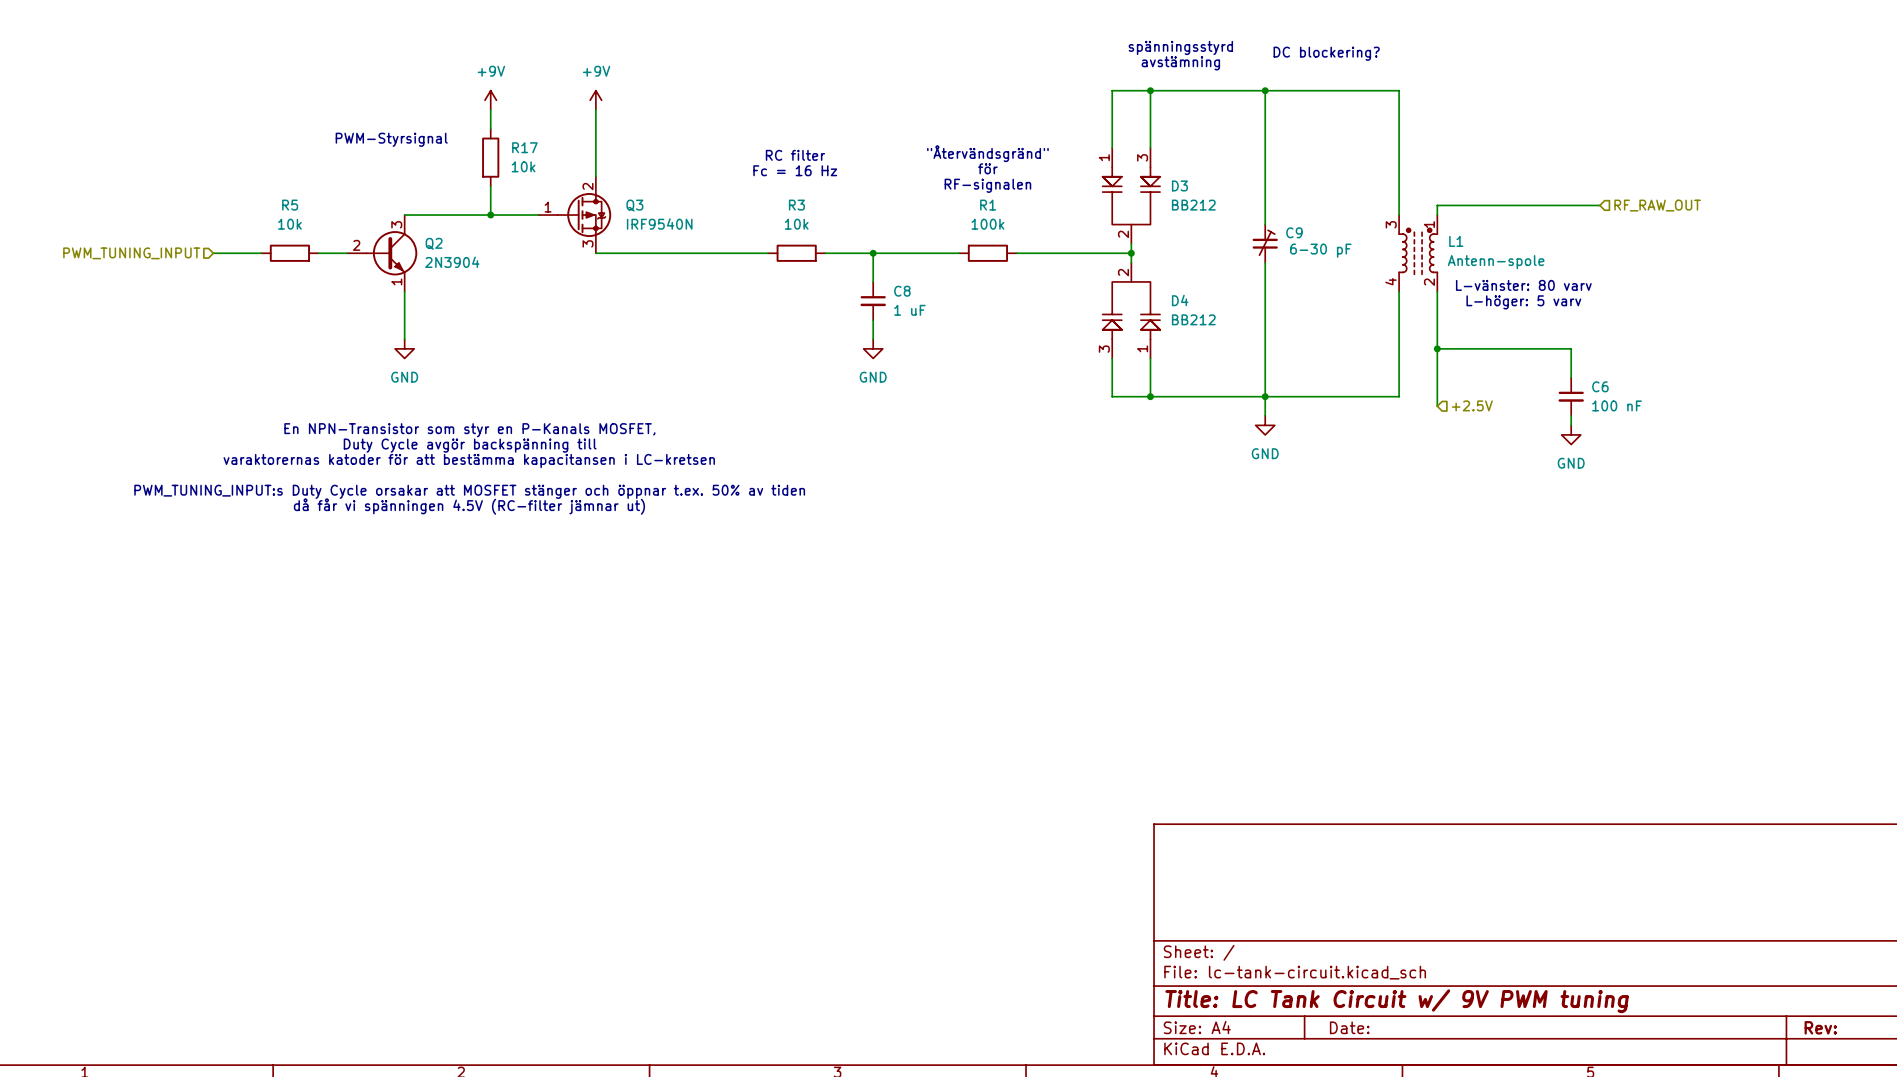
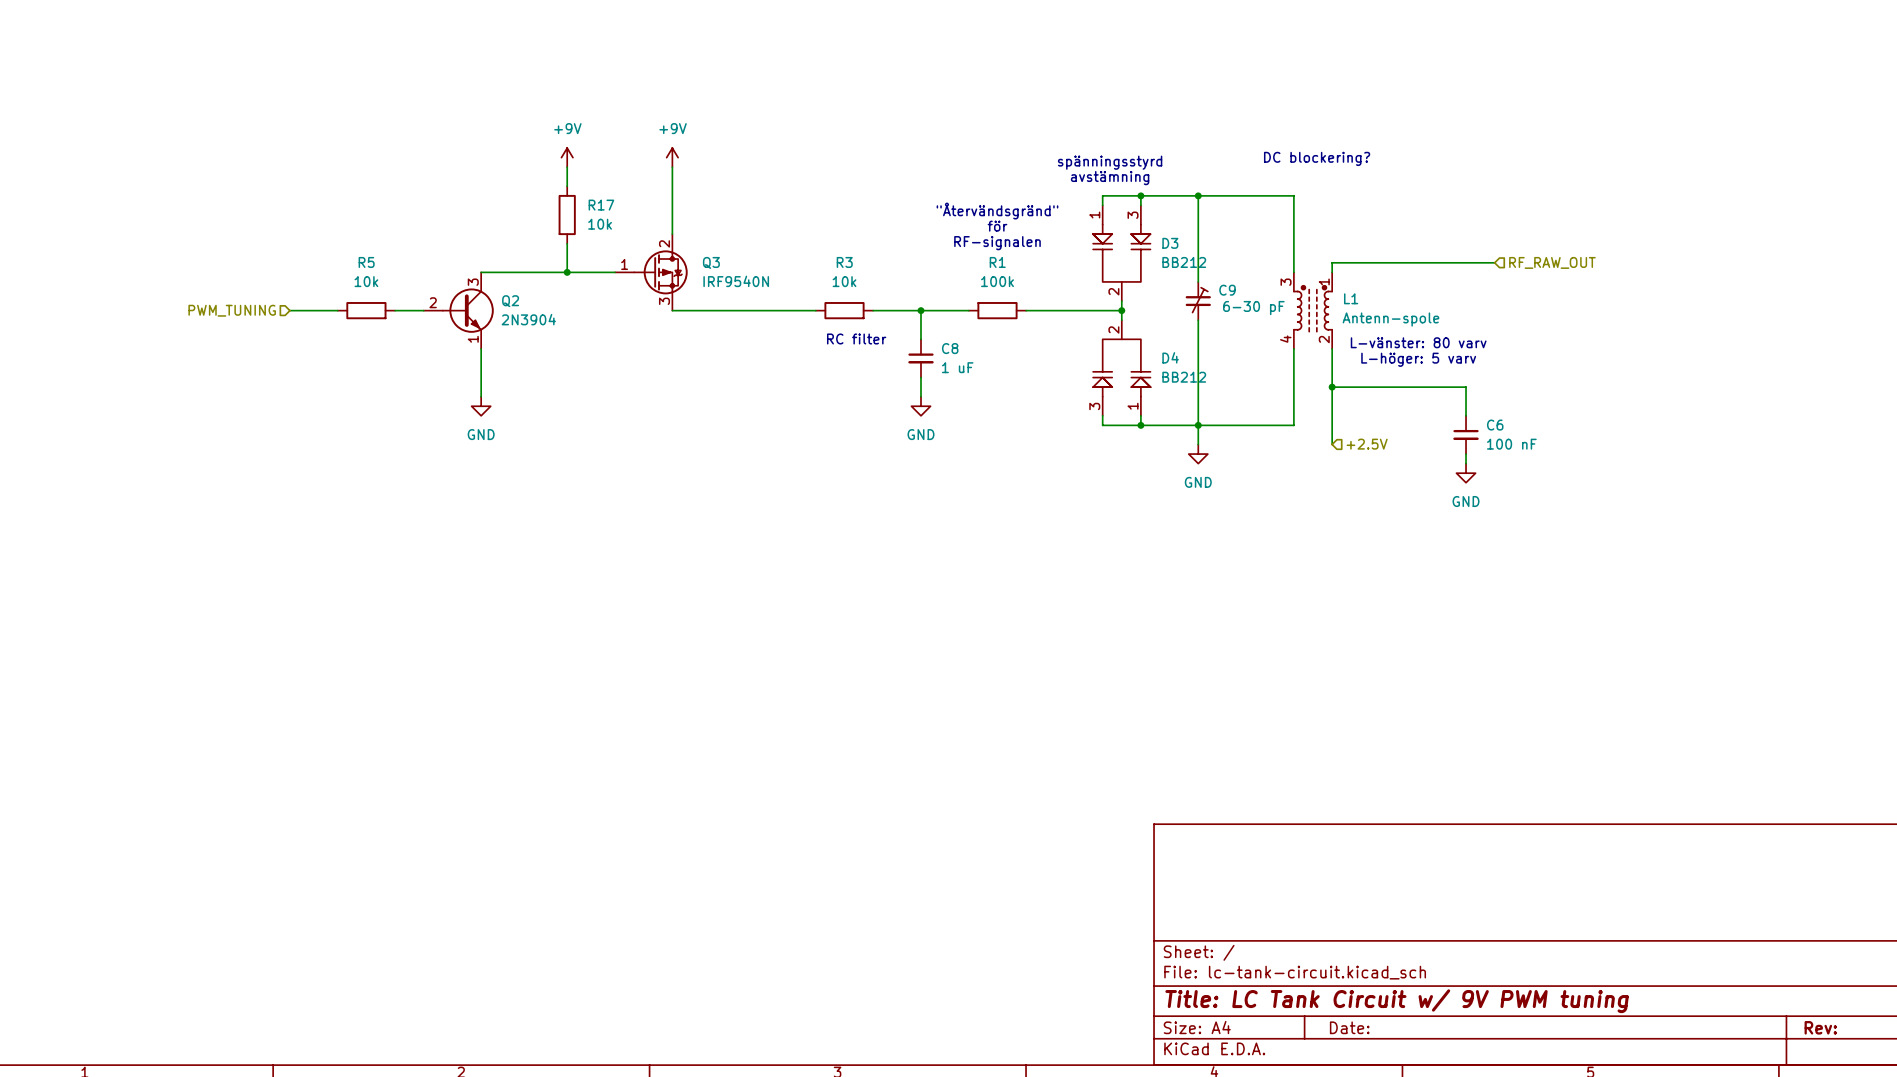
text position: spänningsstyrd (1180, 47) -> spänningsstyrd (1110, 162)
text position: DC blockering? (1326, 53) -> DC blockering? (1317, 158)
text position: avstämning (1180, 63) -> avstämning (1110, 178)
wire: (1150, 90) (1150, 148) -> none
junction: (1150, 90) -> none
wire: (1265, 90) (1265, 224) -> none
junction: (1265, 90) -> none
power symbol: +9V (490, 100) -> none
power symbol: +9V (595, 100) -> none
wire: (490, 109) (490, 128) -> (567, 167) (567, 186)
wire: (595, 109) (595, 176) -> (672, 167) (672, 234)
text: PWM-Styrsignal (391, 139) -> none
wire: (1112, 148) (1112, 90) (1399, 90) (1399, 215) -> none
text position: "Återvändsgränd" (987, 153) -> "Återvändsgränd" (997, 210)
text: RC filter (795, 155) -> none
R17 position: (490, 157) -> (567, 215)
power symbol: none -> +9V (567, 157)
power symbol: none -> +9V (672, 157)
text position: för (987, 168) -> för (997, 226)
text: Fc = 16 Hz (795, 170) -> none
text position: RF-signalen (987, 185) -> RF-signalen (997, 243)
wire: (490, 186) (490, 215) -> (567, 243) (567, 272)
D3 position: (1131, 195) -> (1121, 253)
wire: none -> (1140, 195) (1140, 205)
junction: none -> (1140, 195)
wire: none -> (1198, 195) (1198, 281)
junction: none -> (1198, 195)
wire: none -> (1102, 205) (1102, 195) (1293, 195) (1293, 272)
wire: (1599, 205) (1437, 205) (1437, 215) -> (1494, 262) (1332, 262) (1332, 272)
hierarchical label position: RF_RAW_OUT (1657, 205) -> RF_RAW_OUT (1552, 262)
wire: (404, 215) (538, 215) -> (481, 272) (615, 272)
junction: (490, 215) -> none
Q3 position: (574, 215) -> (651, 272)
wire: (1131, 243) (1131, 262) -> (1121, 301) (1121, 320)
C9 position: (1265, 243) -> (1198, 301)
hierarchical label: PWM_TUNING_INPUT (131, 253) -> none
wire: (213, 253) (261, 253) -> (289, 310) (337, 310)
R5 position: (289, 253) -> (366, 310)
wire: (318, 253) (347, 253) -> (395, 310) (423, 310)
Q2 position: (382, 253) -> (458, 310)
wire: (595, 253) (768, 253) -> none
R3 position: (796, 253) -> (844, 310)
wire: (825, 253) (959, 253) -> none
wire: (873, 253) (873, 281) -> (920, 310) (920, 339)
junction: (873, 253) -> none
R1 position: (987, 253) -> (997, 310)
wire: (1016, 253) (1131, 253) -> none
junction: (1131, 253) -> none
L1 position: (1418, 253) -> (1313, 310)
wire: (1265, 262) (1265, 415) -> none
junction: none -> (567, 272)
text position: L-vänster: 80 varv (1523, 285) -> L-vänster: 80 varv (1418, 342)
wire: (404, 291) (404, 339) -> (481, 348) (481, 396)
wire: (1399, 291) (1399, 396) (1112, 396) (1112, 358) -> none
wire: (1437, 291) (1437, 406) -> none
C8 position: (873, 301) -> (920, 358)
text position: L-höger: 5 varv (1523, 302) -> L-höger: 5 varv (1418, 359)
hierarchical label: none -> PWM_TUNING (232, 310)
wire: none -> (672, 310) (815, 310)
wire: none -> (873, 310) (968, 310)
junction: none -> (920, 310)
wire: none -> (1026, 310) (1121, 310)
junction: none -> (1121, 310)
D4 position: (1131, 310) -> (1121, 368)
wire: (873, 320) (873, 339) -> (920, 377) (920, 396)
wire: none -> (1198, 320) (1198, 444)
text: none -> RC filter (856, 338)
power symbol position: GND (404, 348) -> GND (481, 406)
power symbol position: GND (873, 348) -> GND (920, 406)
wire: none -> (1293, 348) (1293, 425) (1102, 425) (1102, 415)
wire: none -> (1332, 348) (1332, 444)
wire: (1437, 348) (1571, 348) (1571, 377) -> (1332, 387) (1466, 387) (1466, 415)
junction: (1437, 348) -> none
wire: (1150, 358) (1150, 396) -> none
junction: none -> (1332, 387)
junction: (1150, 396) -> none
junction: (1265, 396) -> none
C6 position: (1571, 396) -> (1466, 434)
hierarchical label position: +2.5V (1472, 405) -> +2.5V (1367, 444)
wire: none -> (1140, 415) (1140, 425)
wire: (1571, 415) (1571, 425) -> (1466, 454) (1466, 463)
junction: none -> (1140, 425)
junction: none -> (1198, 425)
power symbol position: GND (1265, 425) -> GND (1198, 454)
text: En NPN-Transistor som styr en P-Kanals MOSFET, (469, 430) -> none
power symbol: GND (1571, 434) -> none
text: Duty Cycle avgör backspänning till (470, 445) -> none
text: varaktorernas katoder för att bestämma kapacitansen i LC-kretsen (469, 461) -> none
power symbol: none -> GND (1466, 473)
text: PWM_TUNING_INPUT:s Duty Cycle orsakar att MOSFET stänger och öppnar t.ex. 50% av tiden (469, 491) -> none
text: då får vi spänningen 4.5V (RC-filter jämnar ut) (469, 506) -> none

